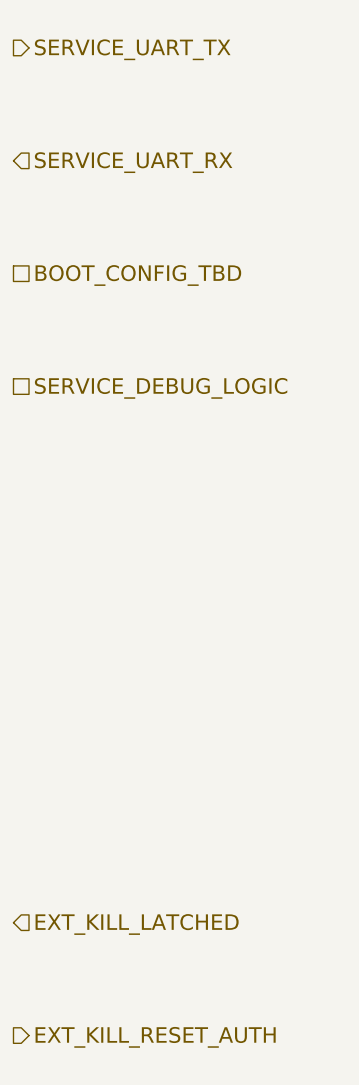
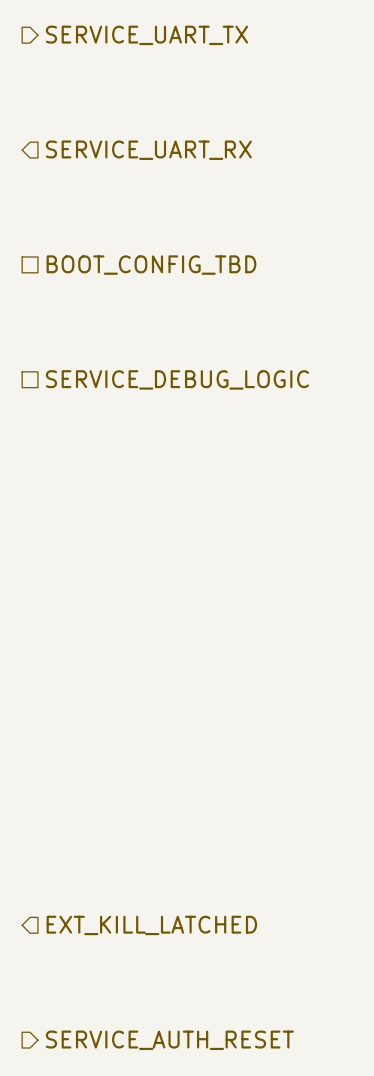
hierarchical label: EXT_KILL_RESET_AUTH (155, 1037) -> SERVICE_AUTH_RESET (169, 1040)

